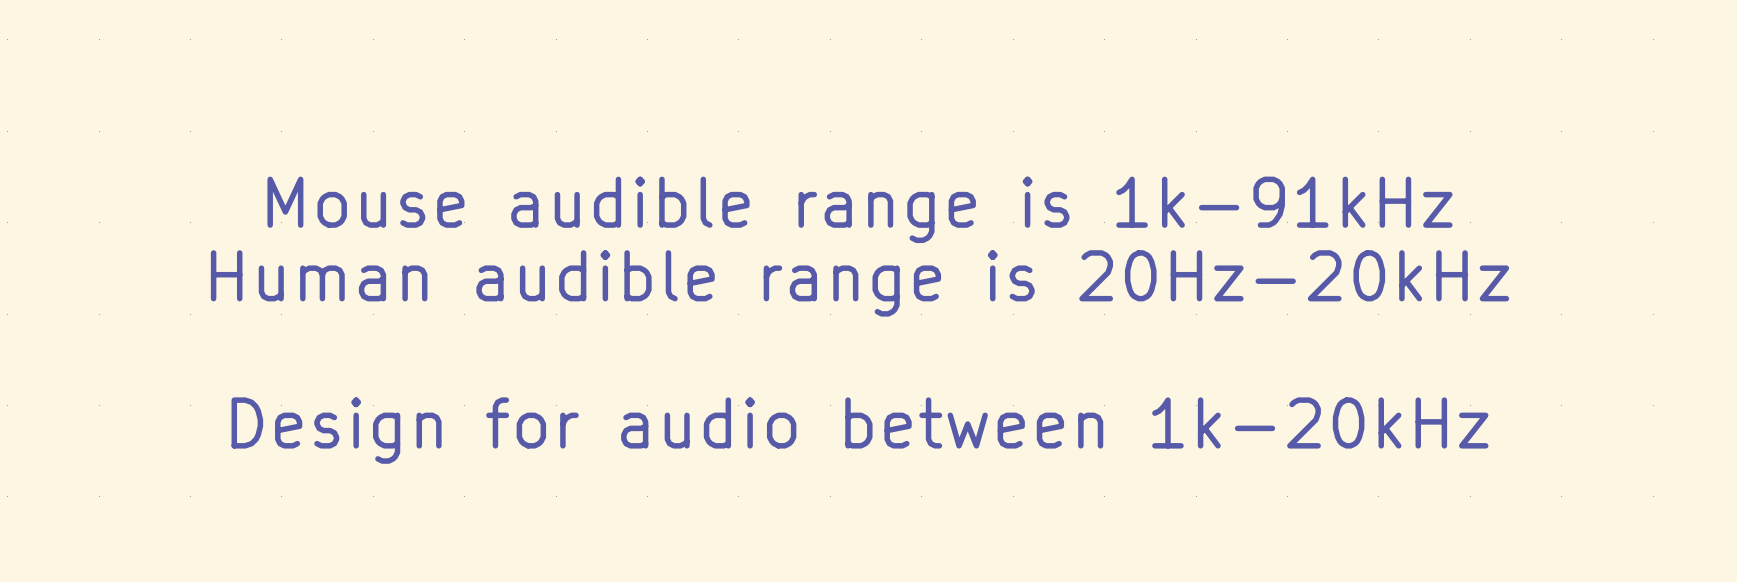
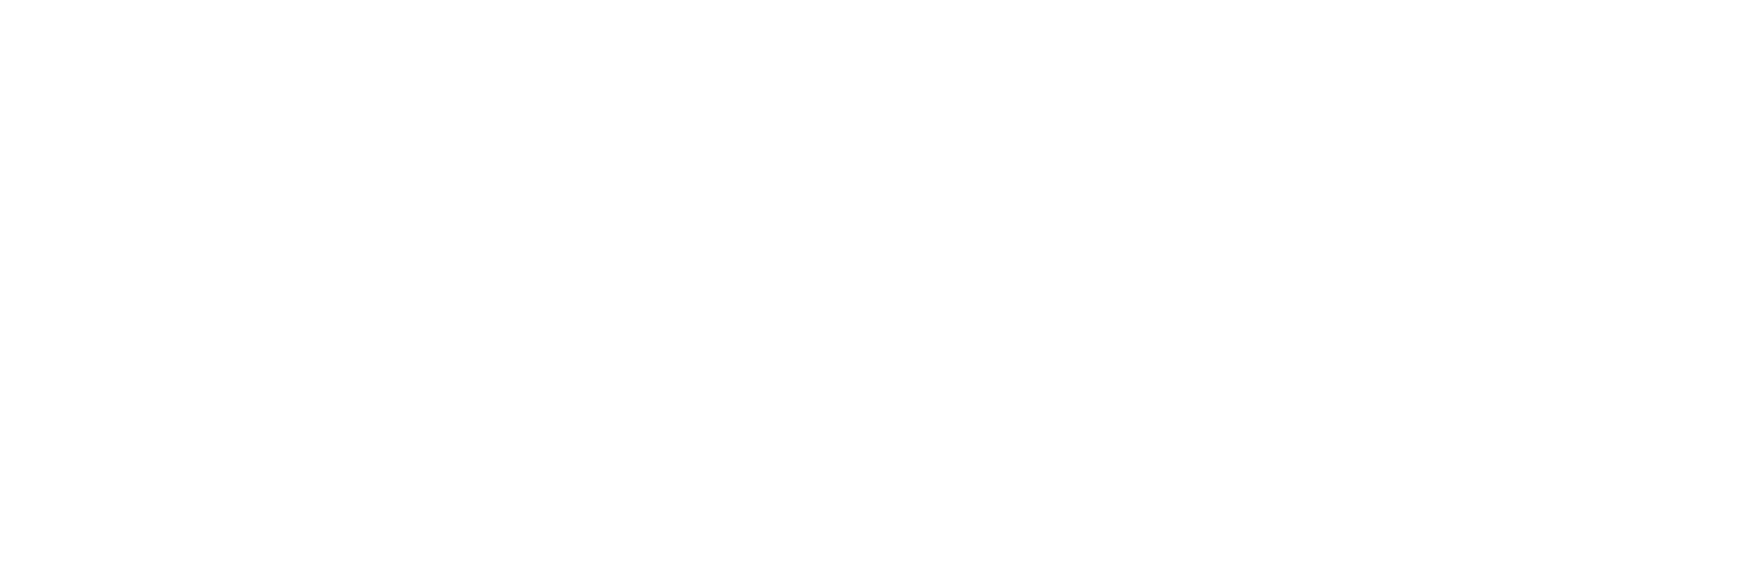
text: Mouse audible range is 1k-91kHz (860, 209) -> none
text: Human audible range is 20Hz-20kHz (860, 283) -> none
text: Design for audio between 1k-20kHz (860, 430) -> none

